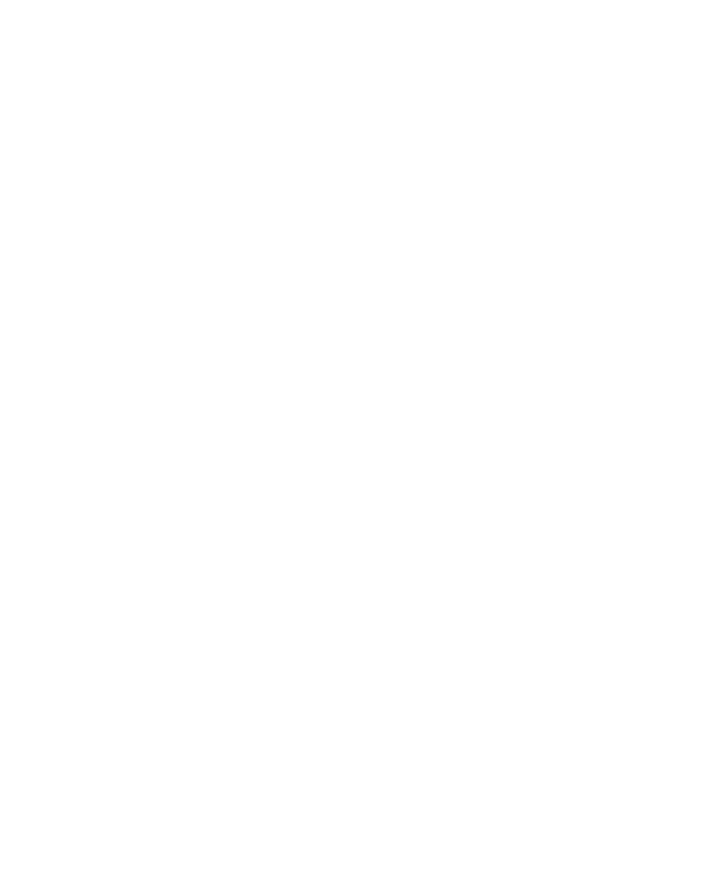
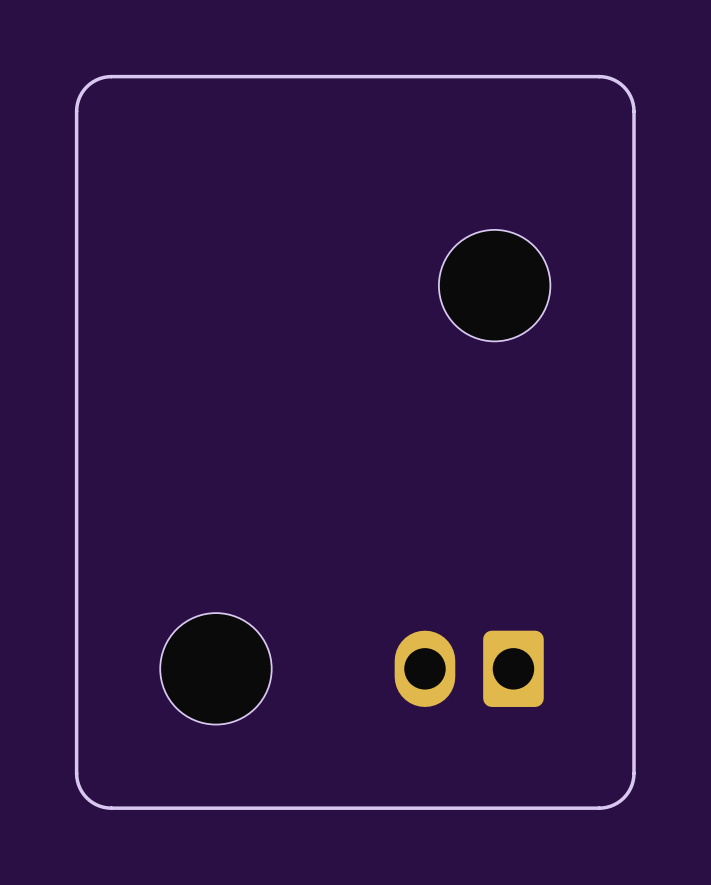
board edge: none -> (599, 76) (111, 76) (92, 81) (81, 92) (76, 111) (76, 773) (81, 791) (92, 802) (111, 808) (599, 808) (614, 804) (628, 791) (633, 773) (633, 111) (630, 96) (623, 86) (610, 78) (599, 76)
part: none -> (494, 285)
part: none -> (215, 668)
part: none -> (469, 668)

